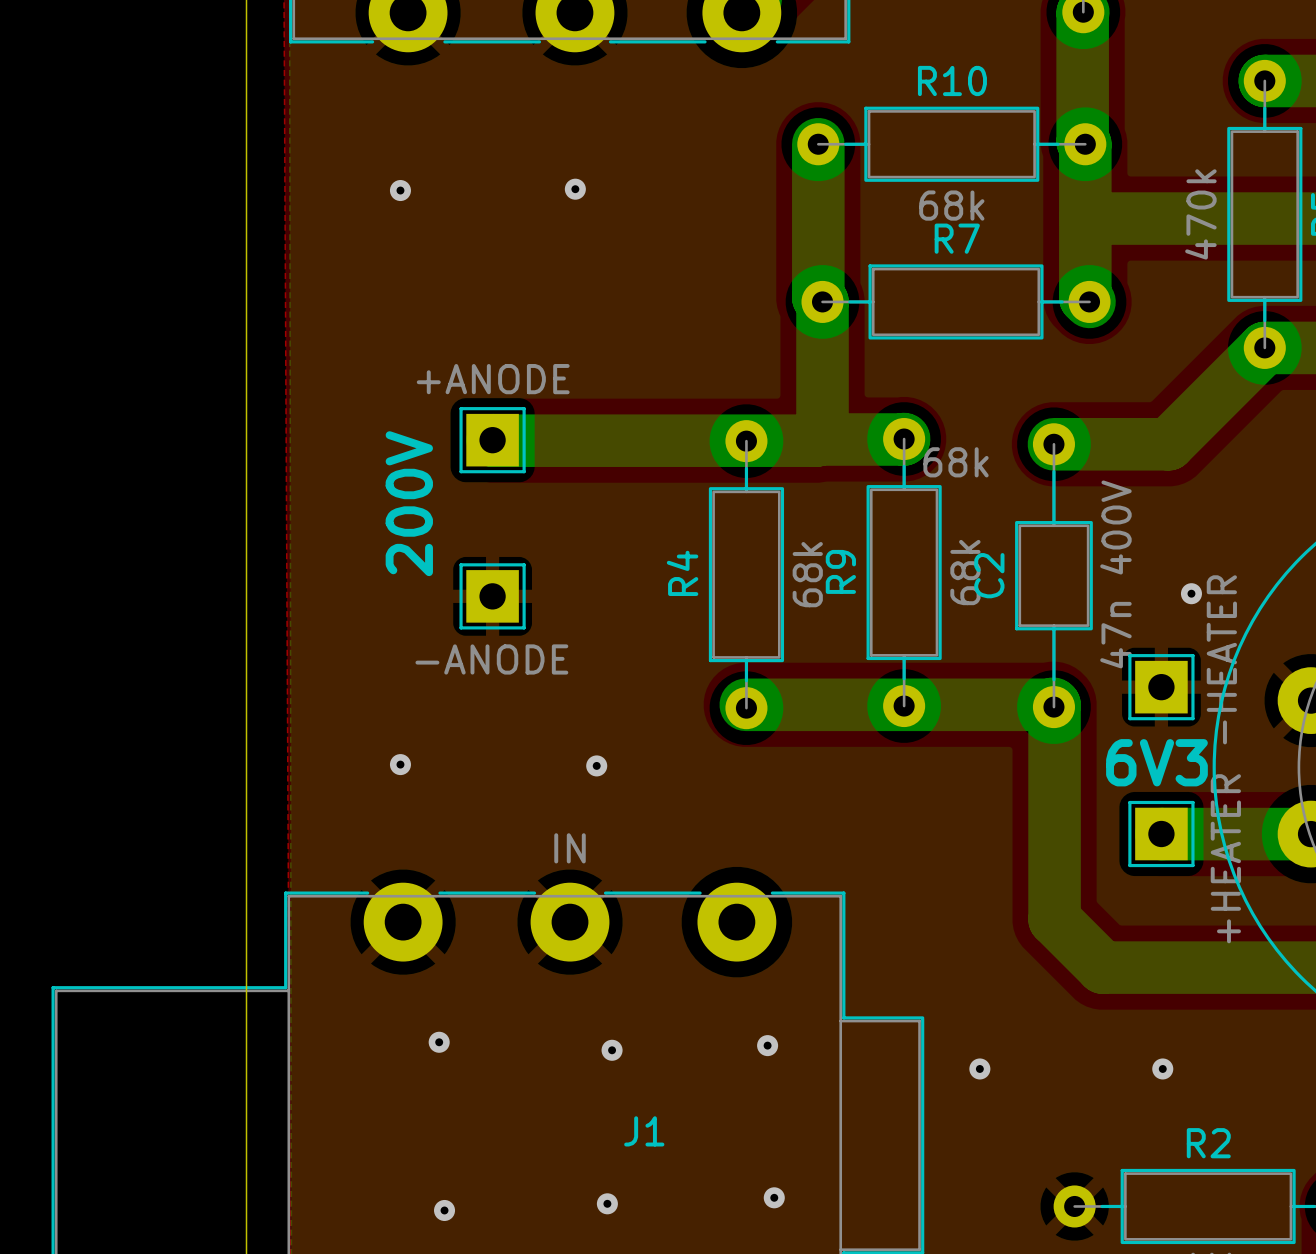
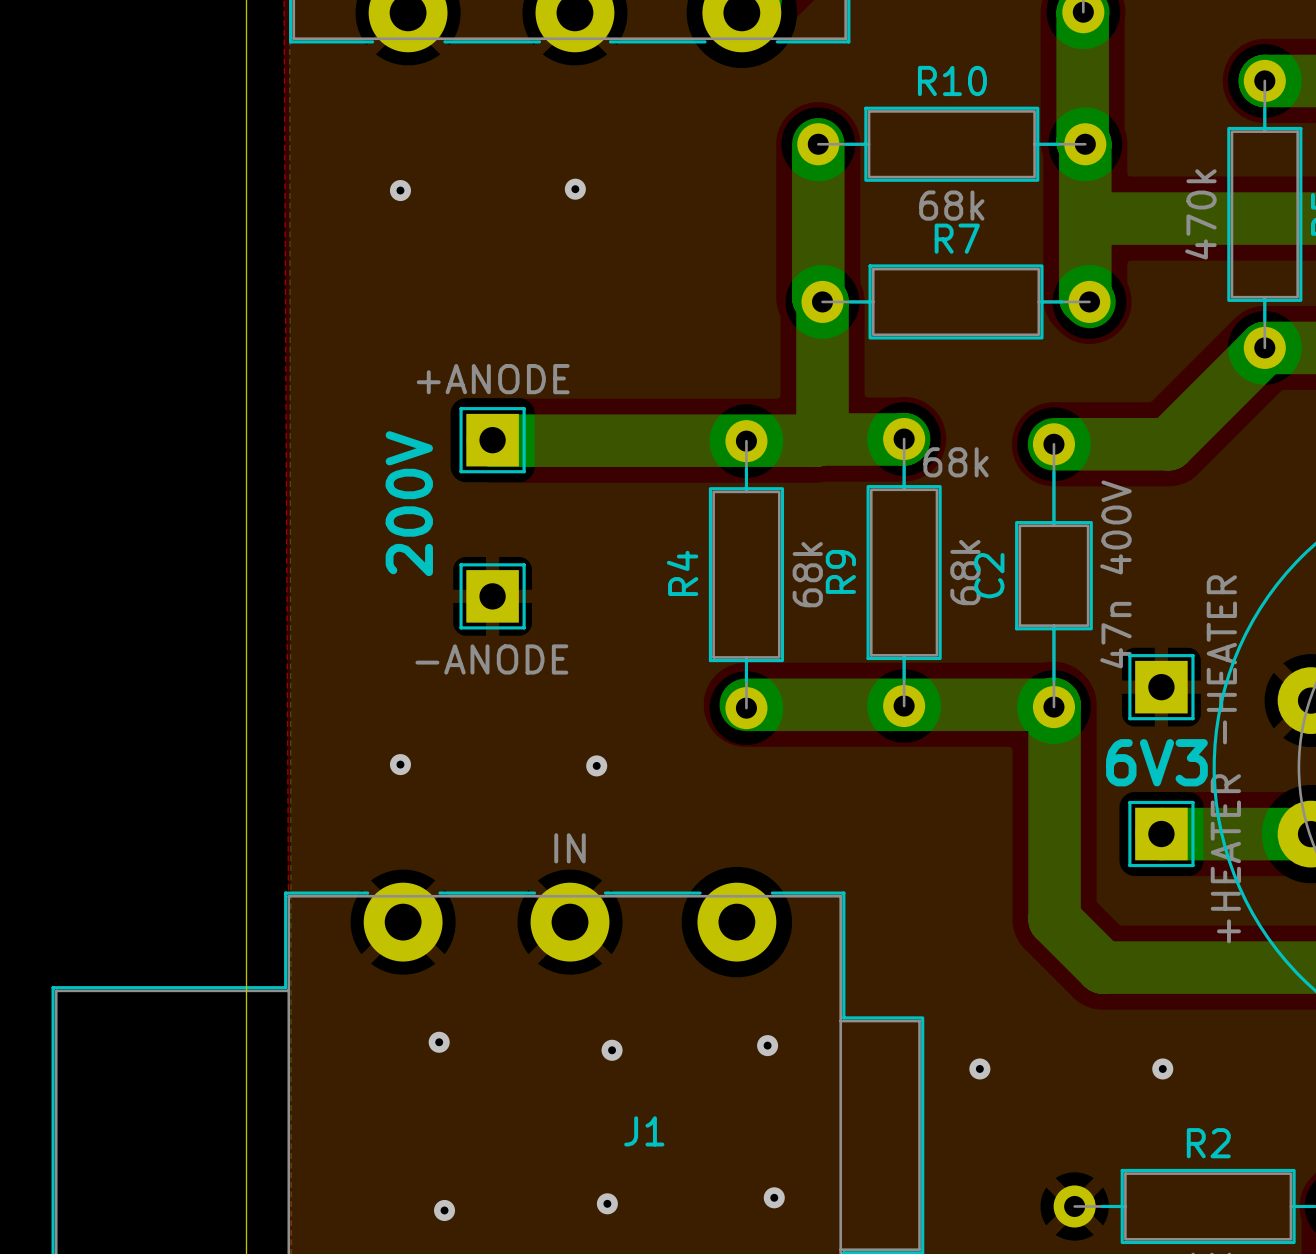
via: (1191, 593) -> none

